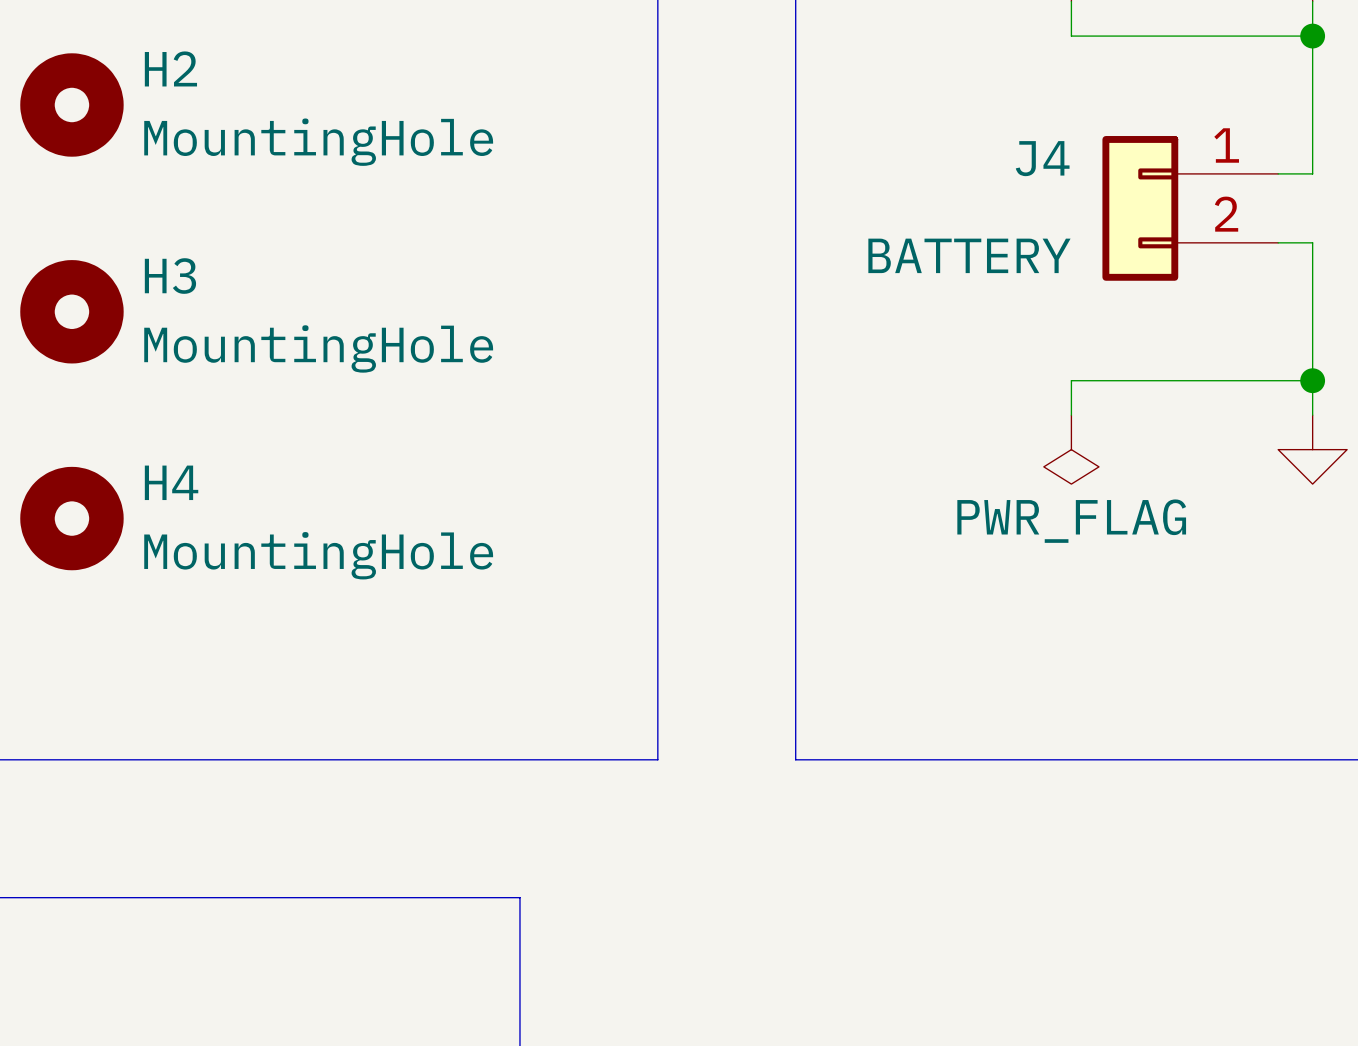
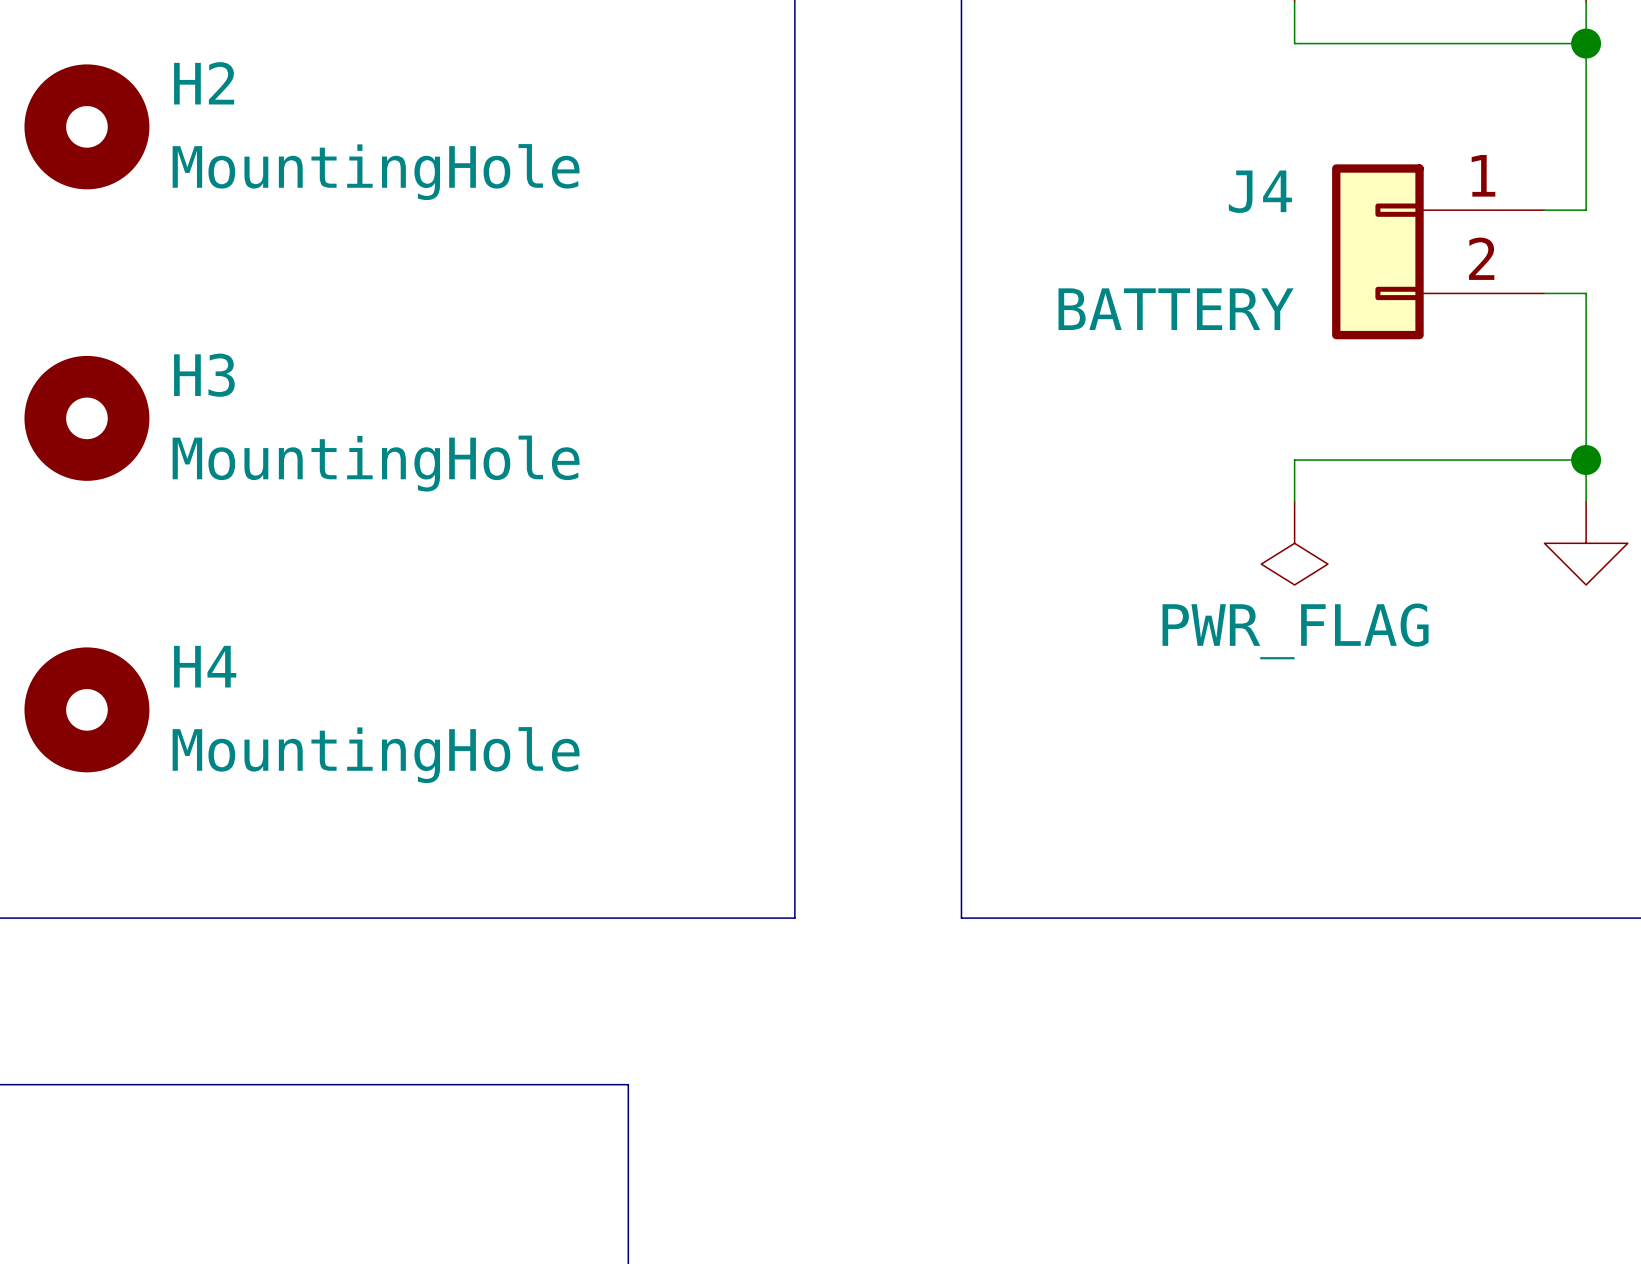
H3 position: (71, 311) -> (86, 418)
H4 position: (71, 518) -> (86, 709)

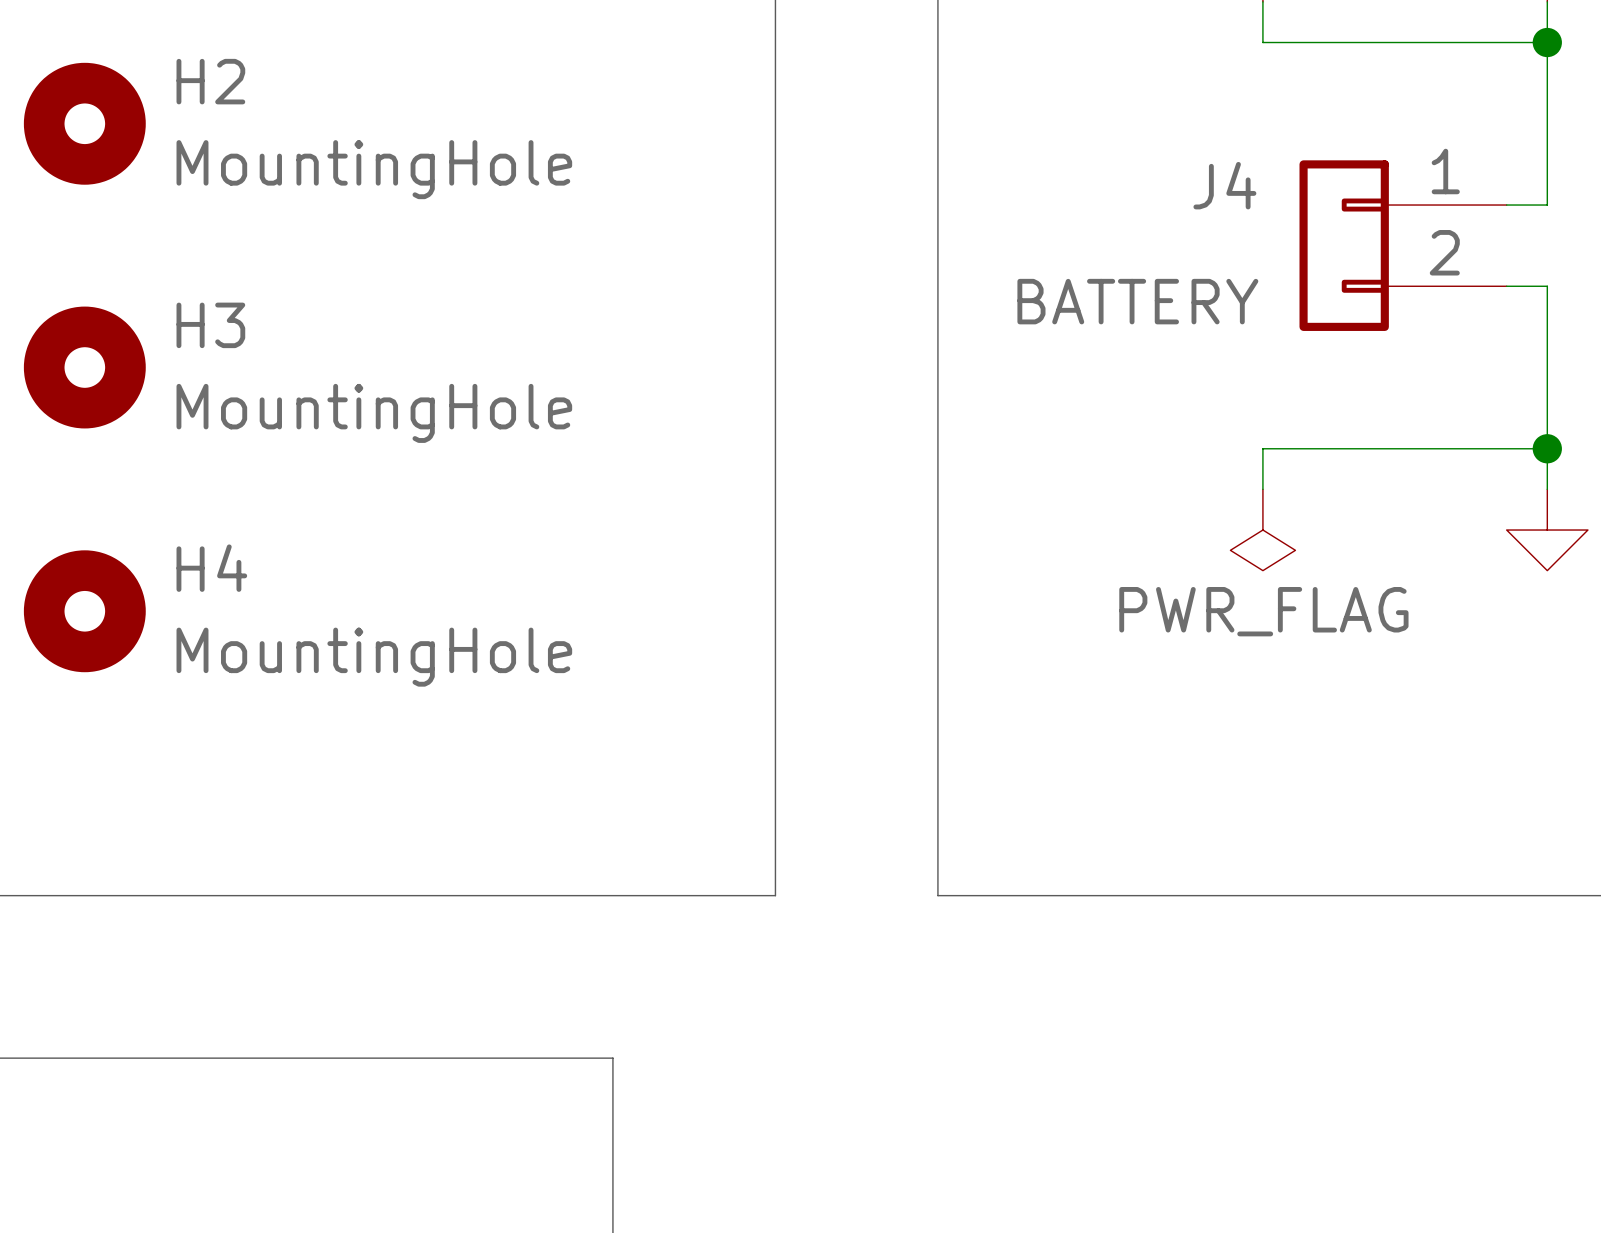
H3 position: (86, 418) -> (84, 367)
H4 position: (86, 709) -> (84, 611)

